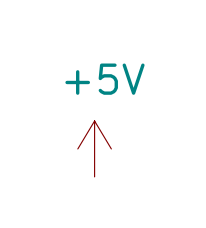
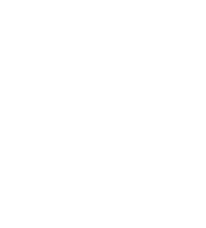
power symbol: +5V (94, 148) -> none

